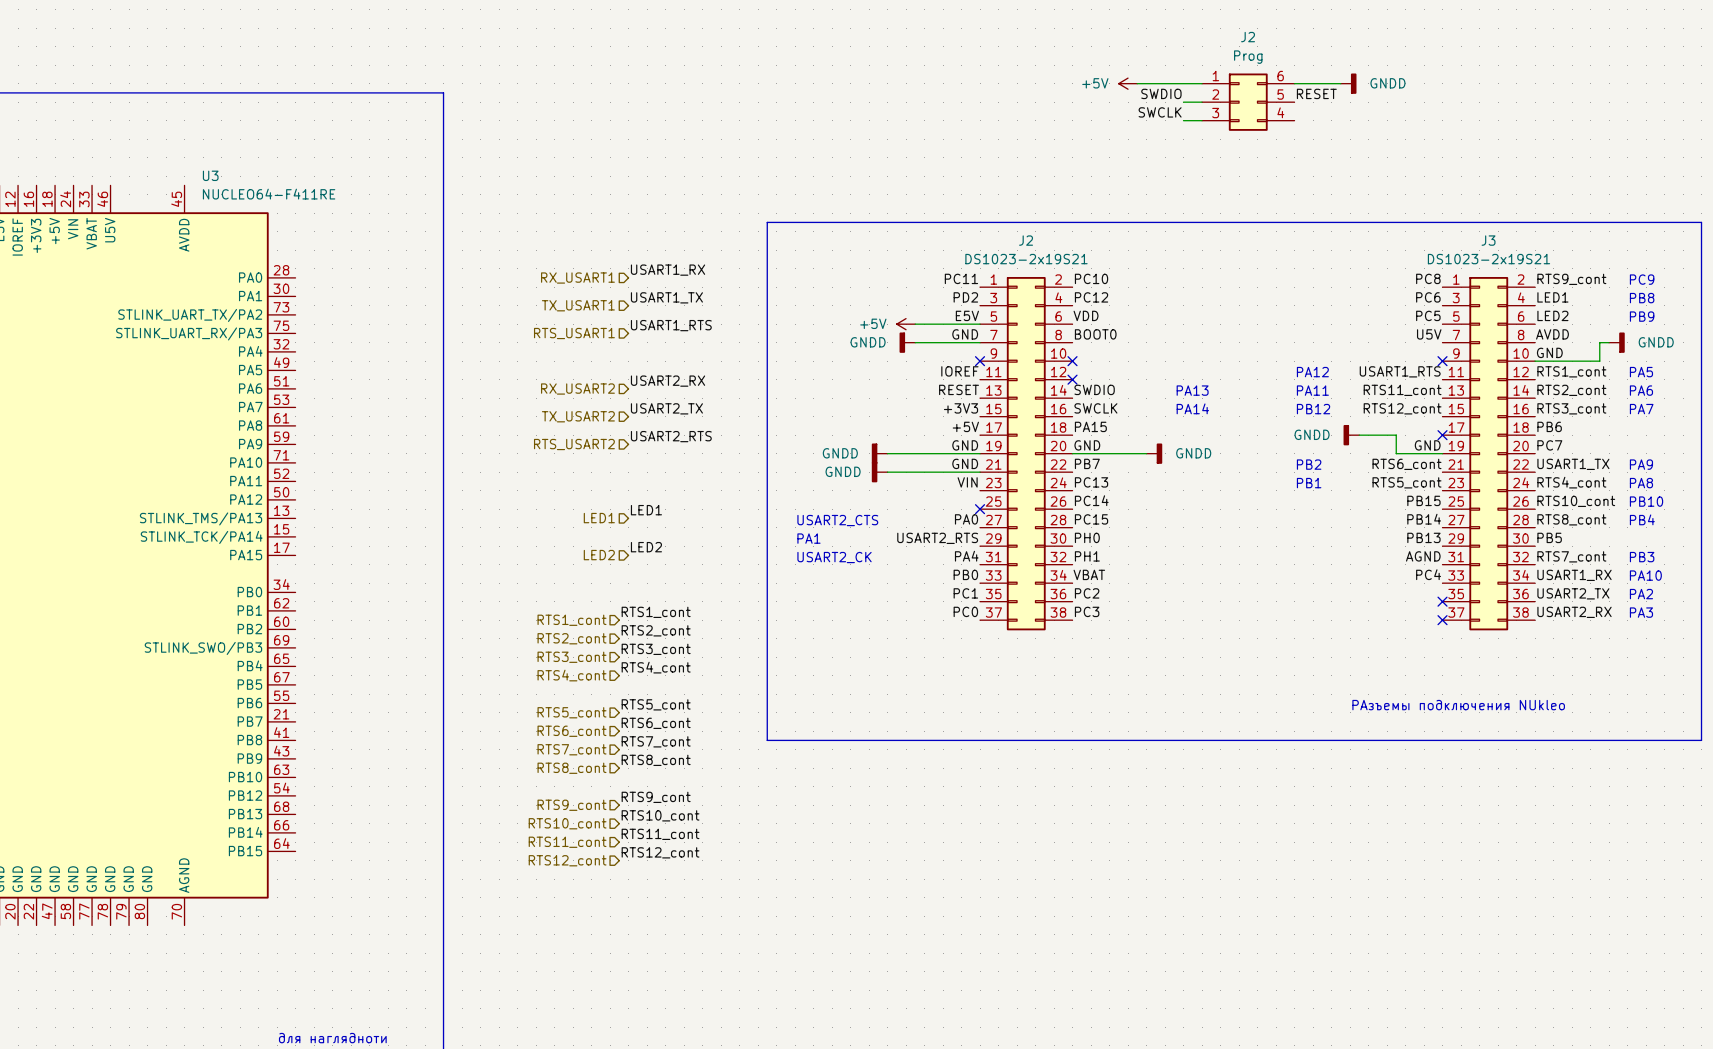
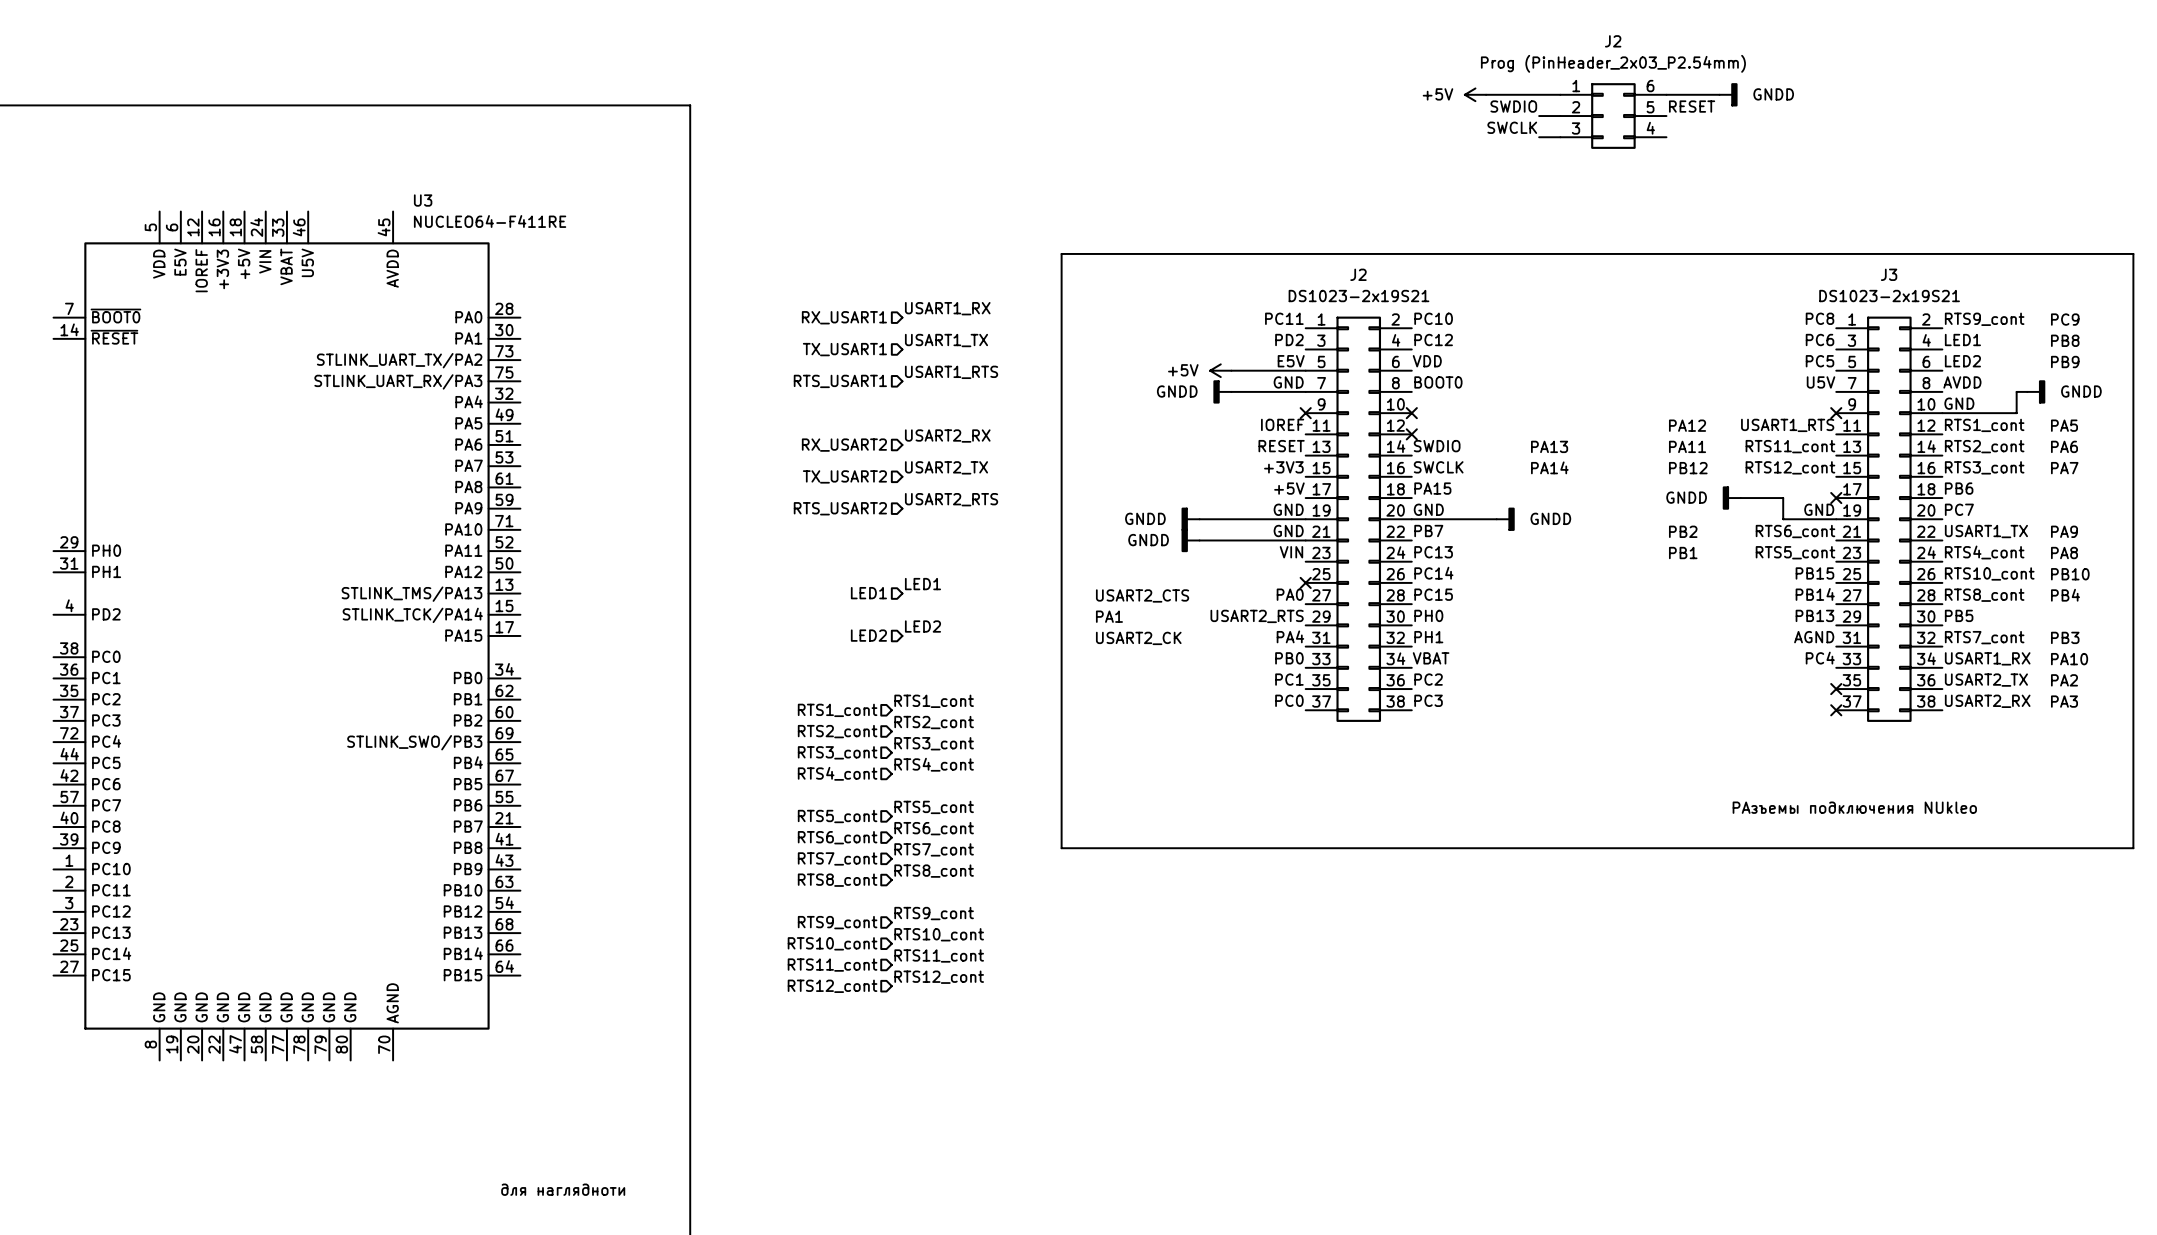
J2 value: Prog (1248, 57) -> Prog (PinHeader_2x03_P2.54mm) (1613, 63)

